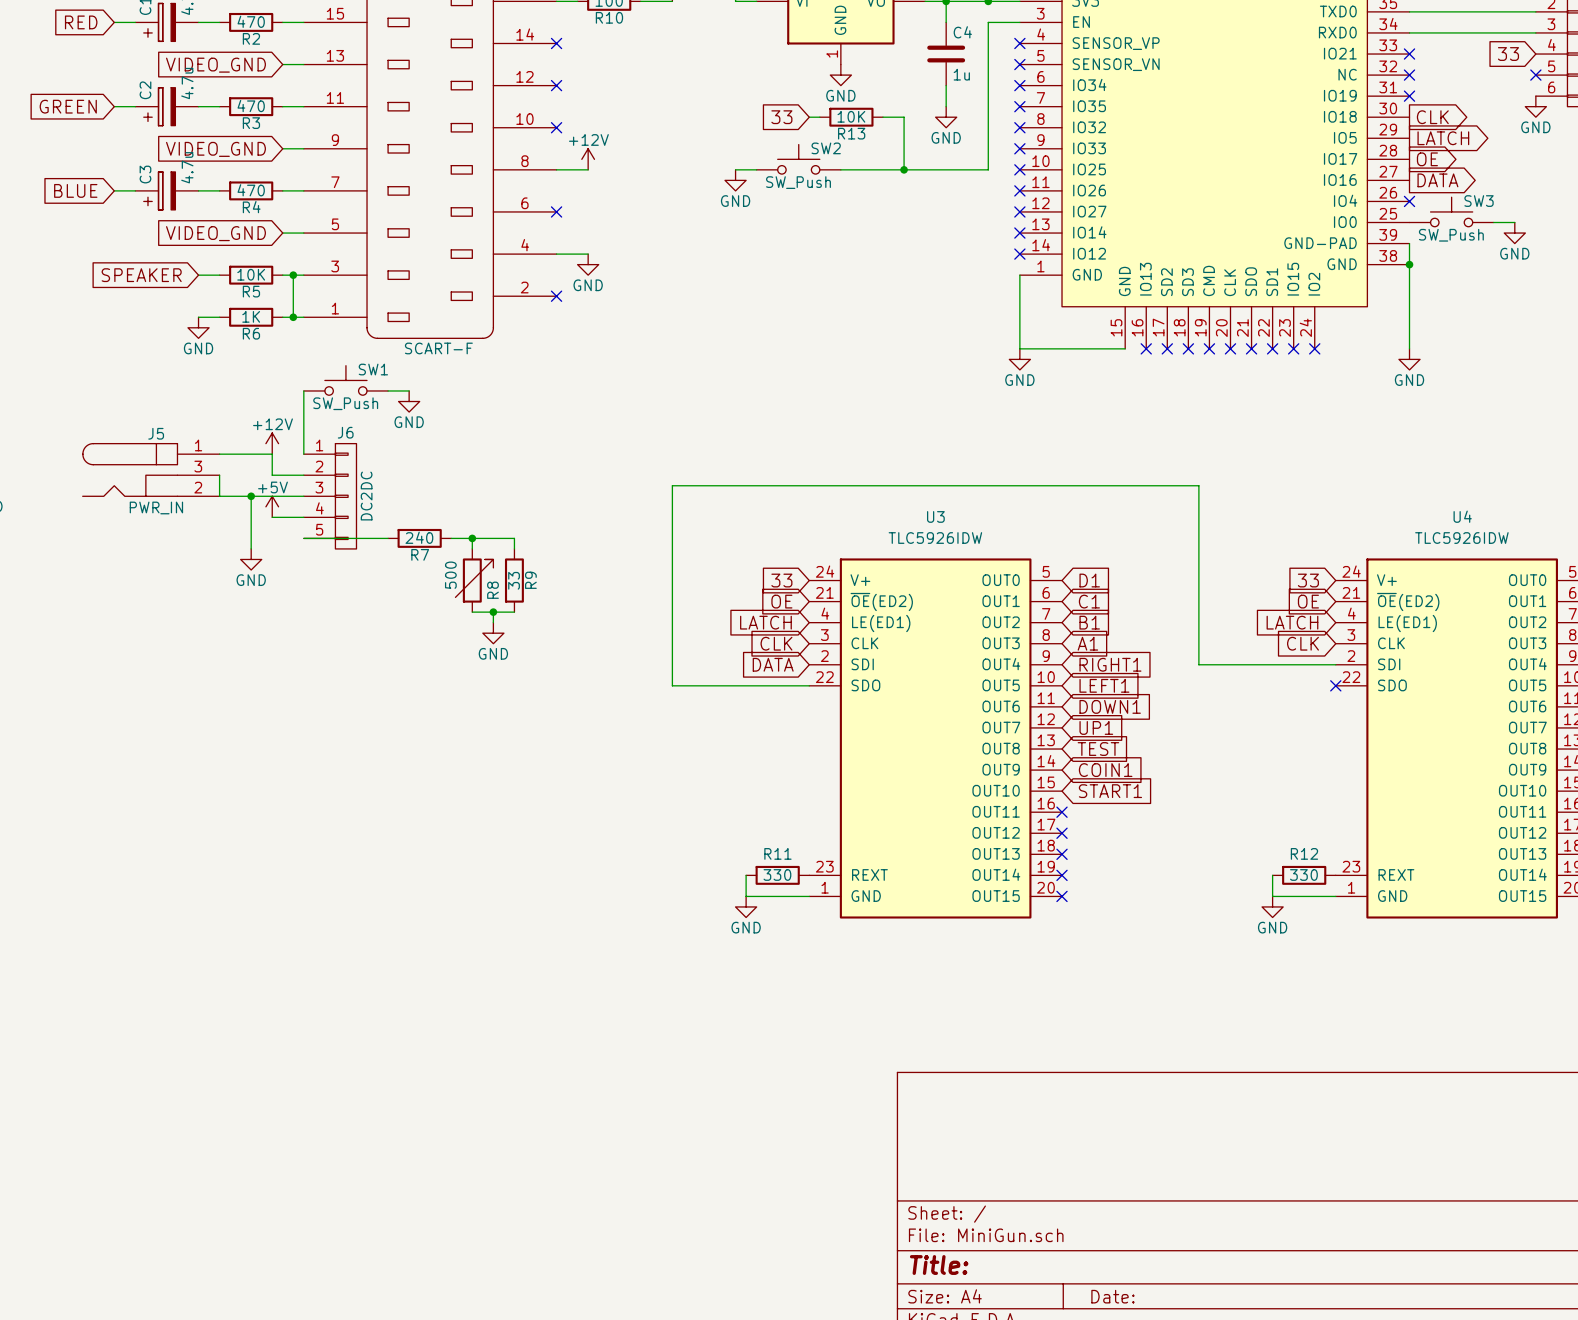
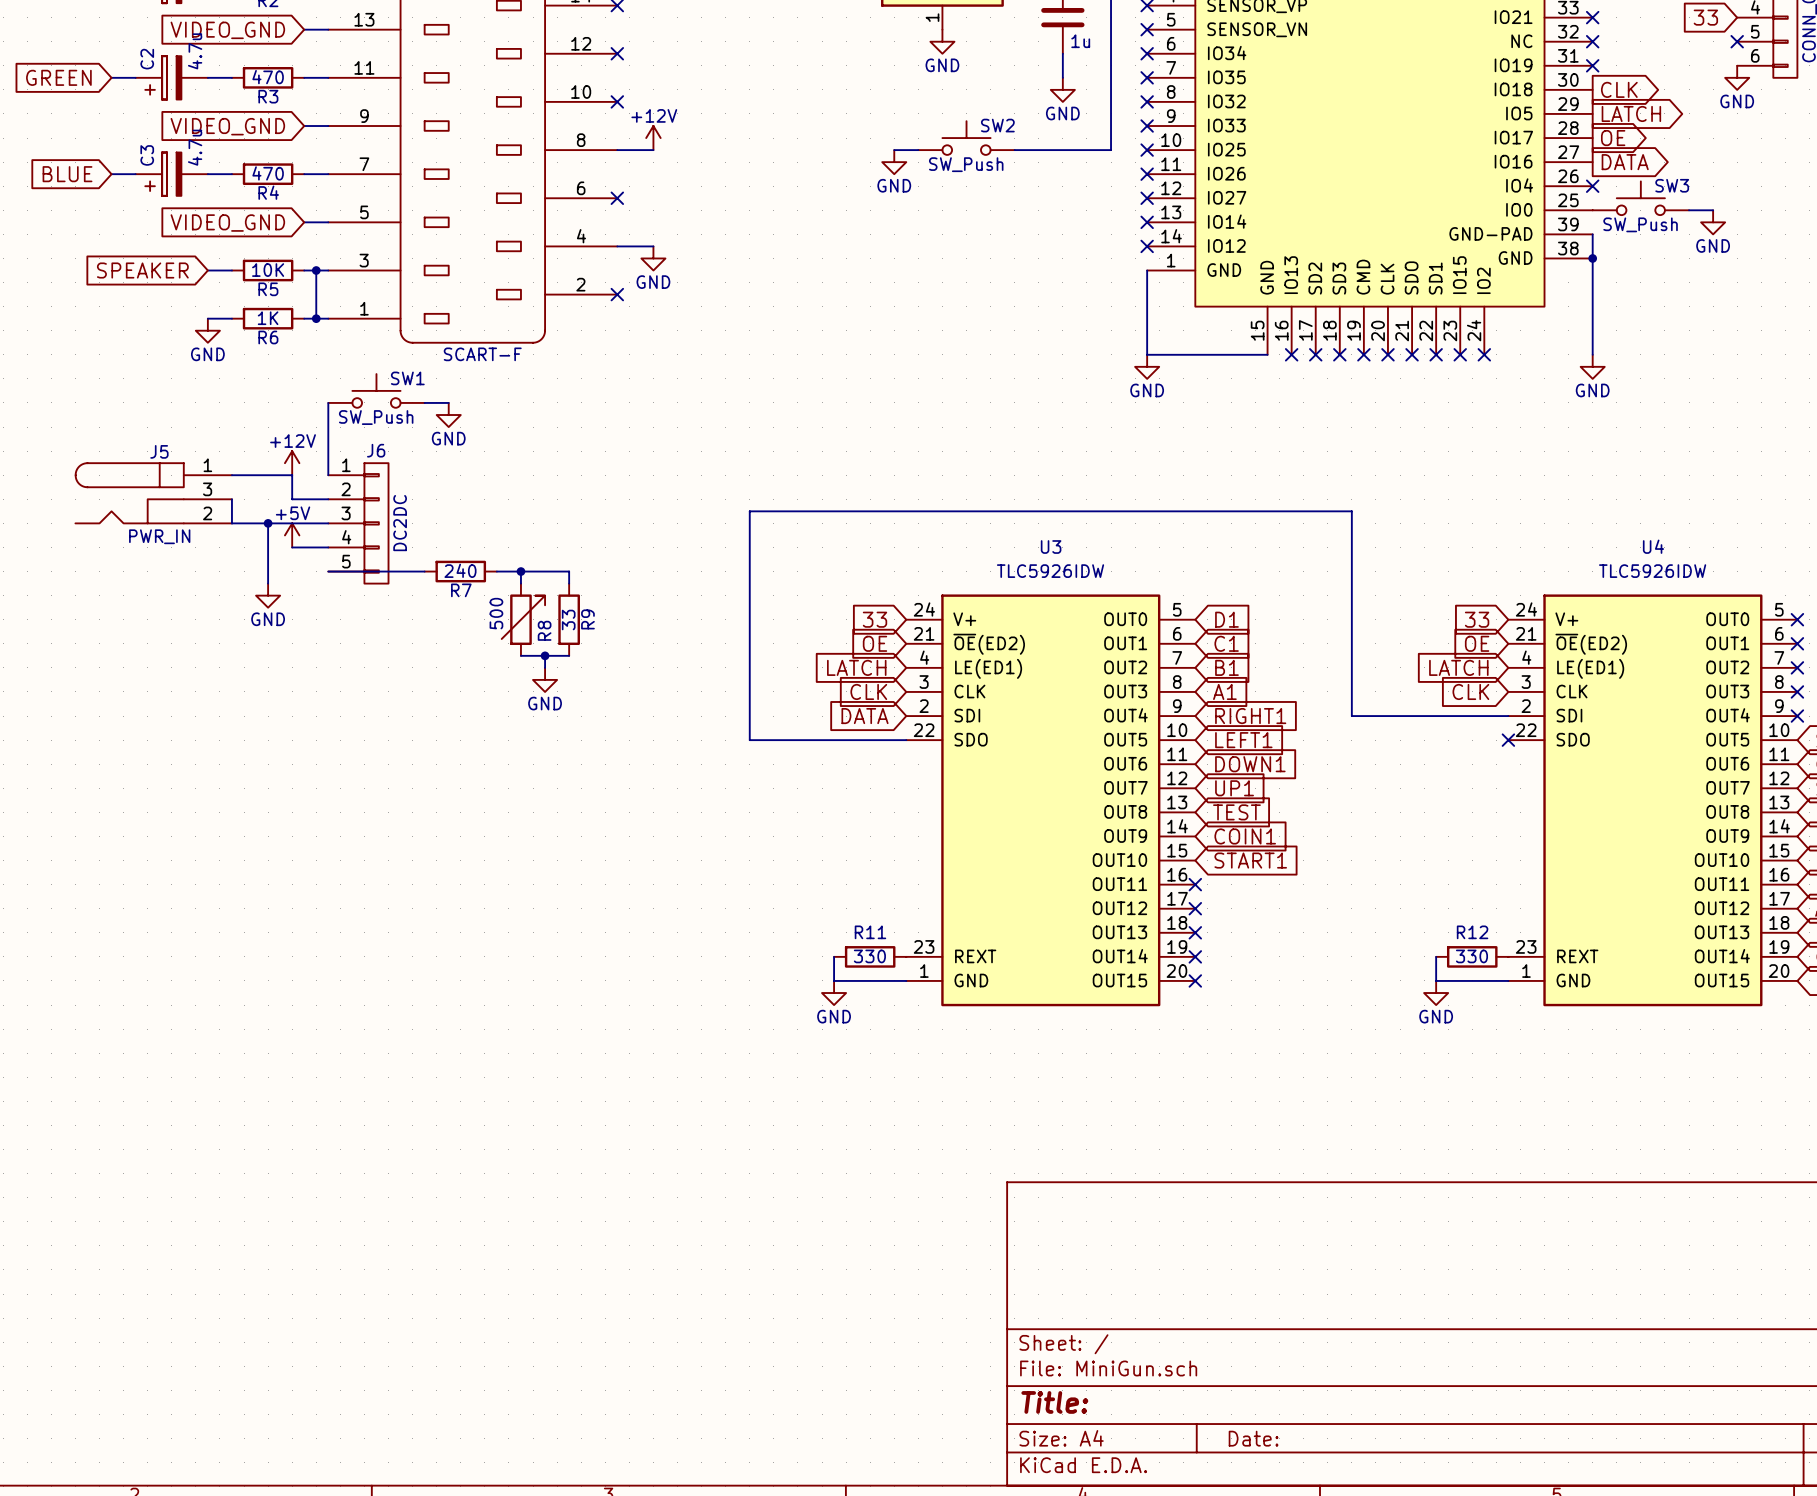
global label: 33 (781, 117) -> none
wire: (809, 117) (819, 117) -> none
R13: 10K (851, 117) -> none
wire: (882, 117) (904, 117) (904, 169) (840, 169) -> none
SW2 position: (798, 159) -> (966, 138)
wire: (735, 169) (756, 169) -> (894, 150) (918, 150)
junction: (904, 169) -> none
power symbol position: GND (735, 180) -> GND (894, 162)

